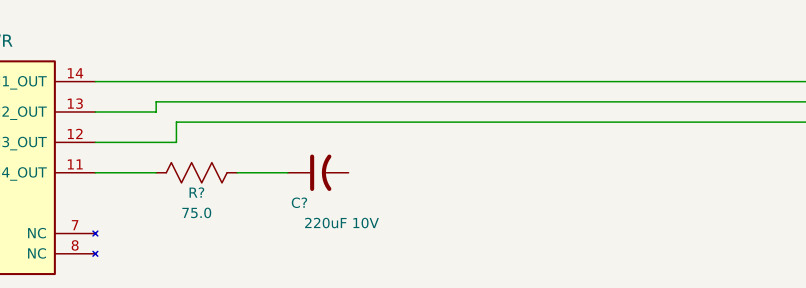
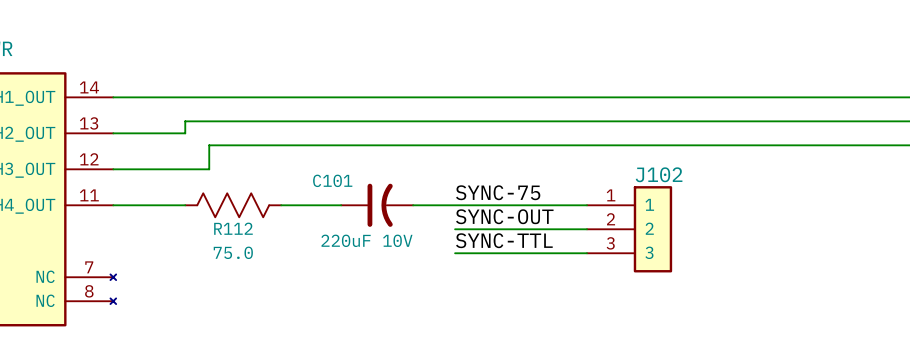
label: none -> SYNC-75 (498, 192)
wire: none -> (413, 205) (587, 205)
label: none -> SYNC-OUT (504, 216)
R? name: R? (196, 192) -> R112 (233, 228)
wire: none -> (455, 229) (587, 229)
J102: none -> (629, 229)
C? name: C? (299, 202) -> C101 (332, 180)
label: none -> SYNC-TTL (504, 240)
wire: none -> (455, 253) (587, 253)
C? value position: 220uF 10V (341, 223) -> 220uF 10V (366, 240)

